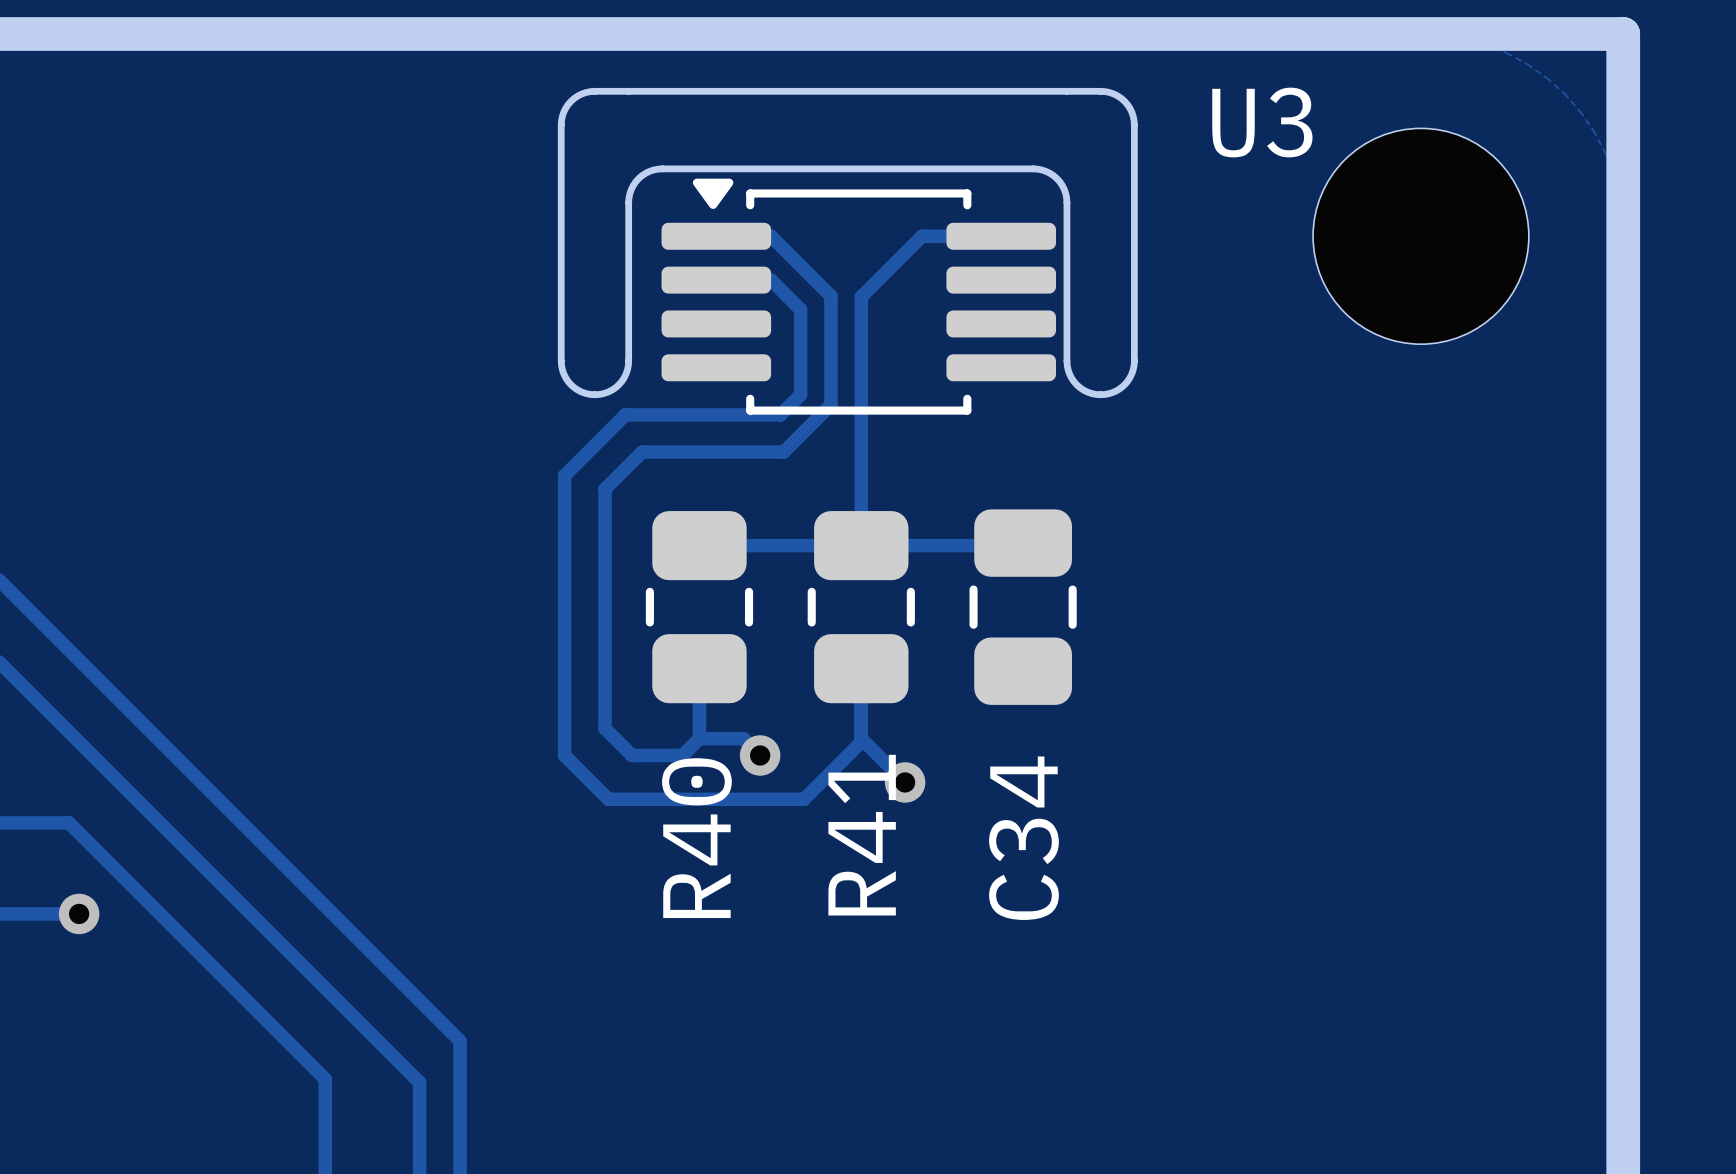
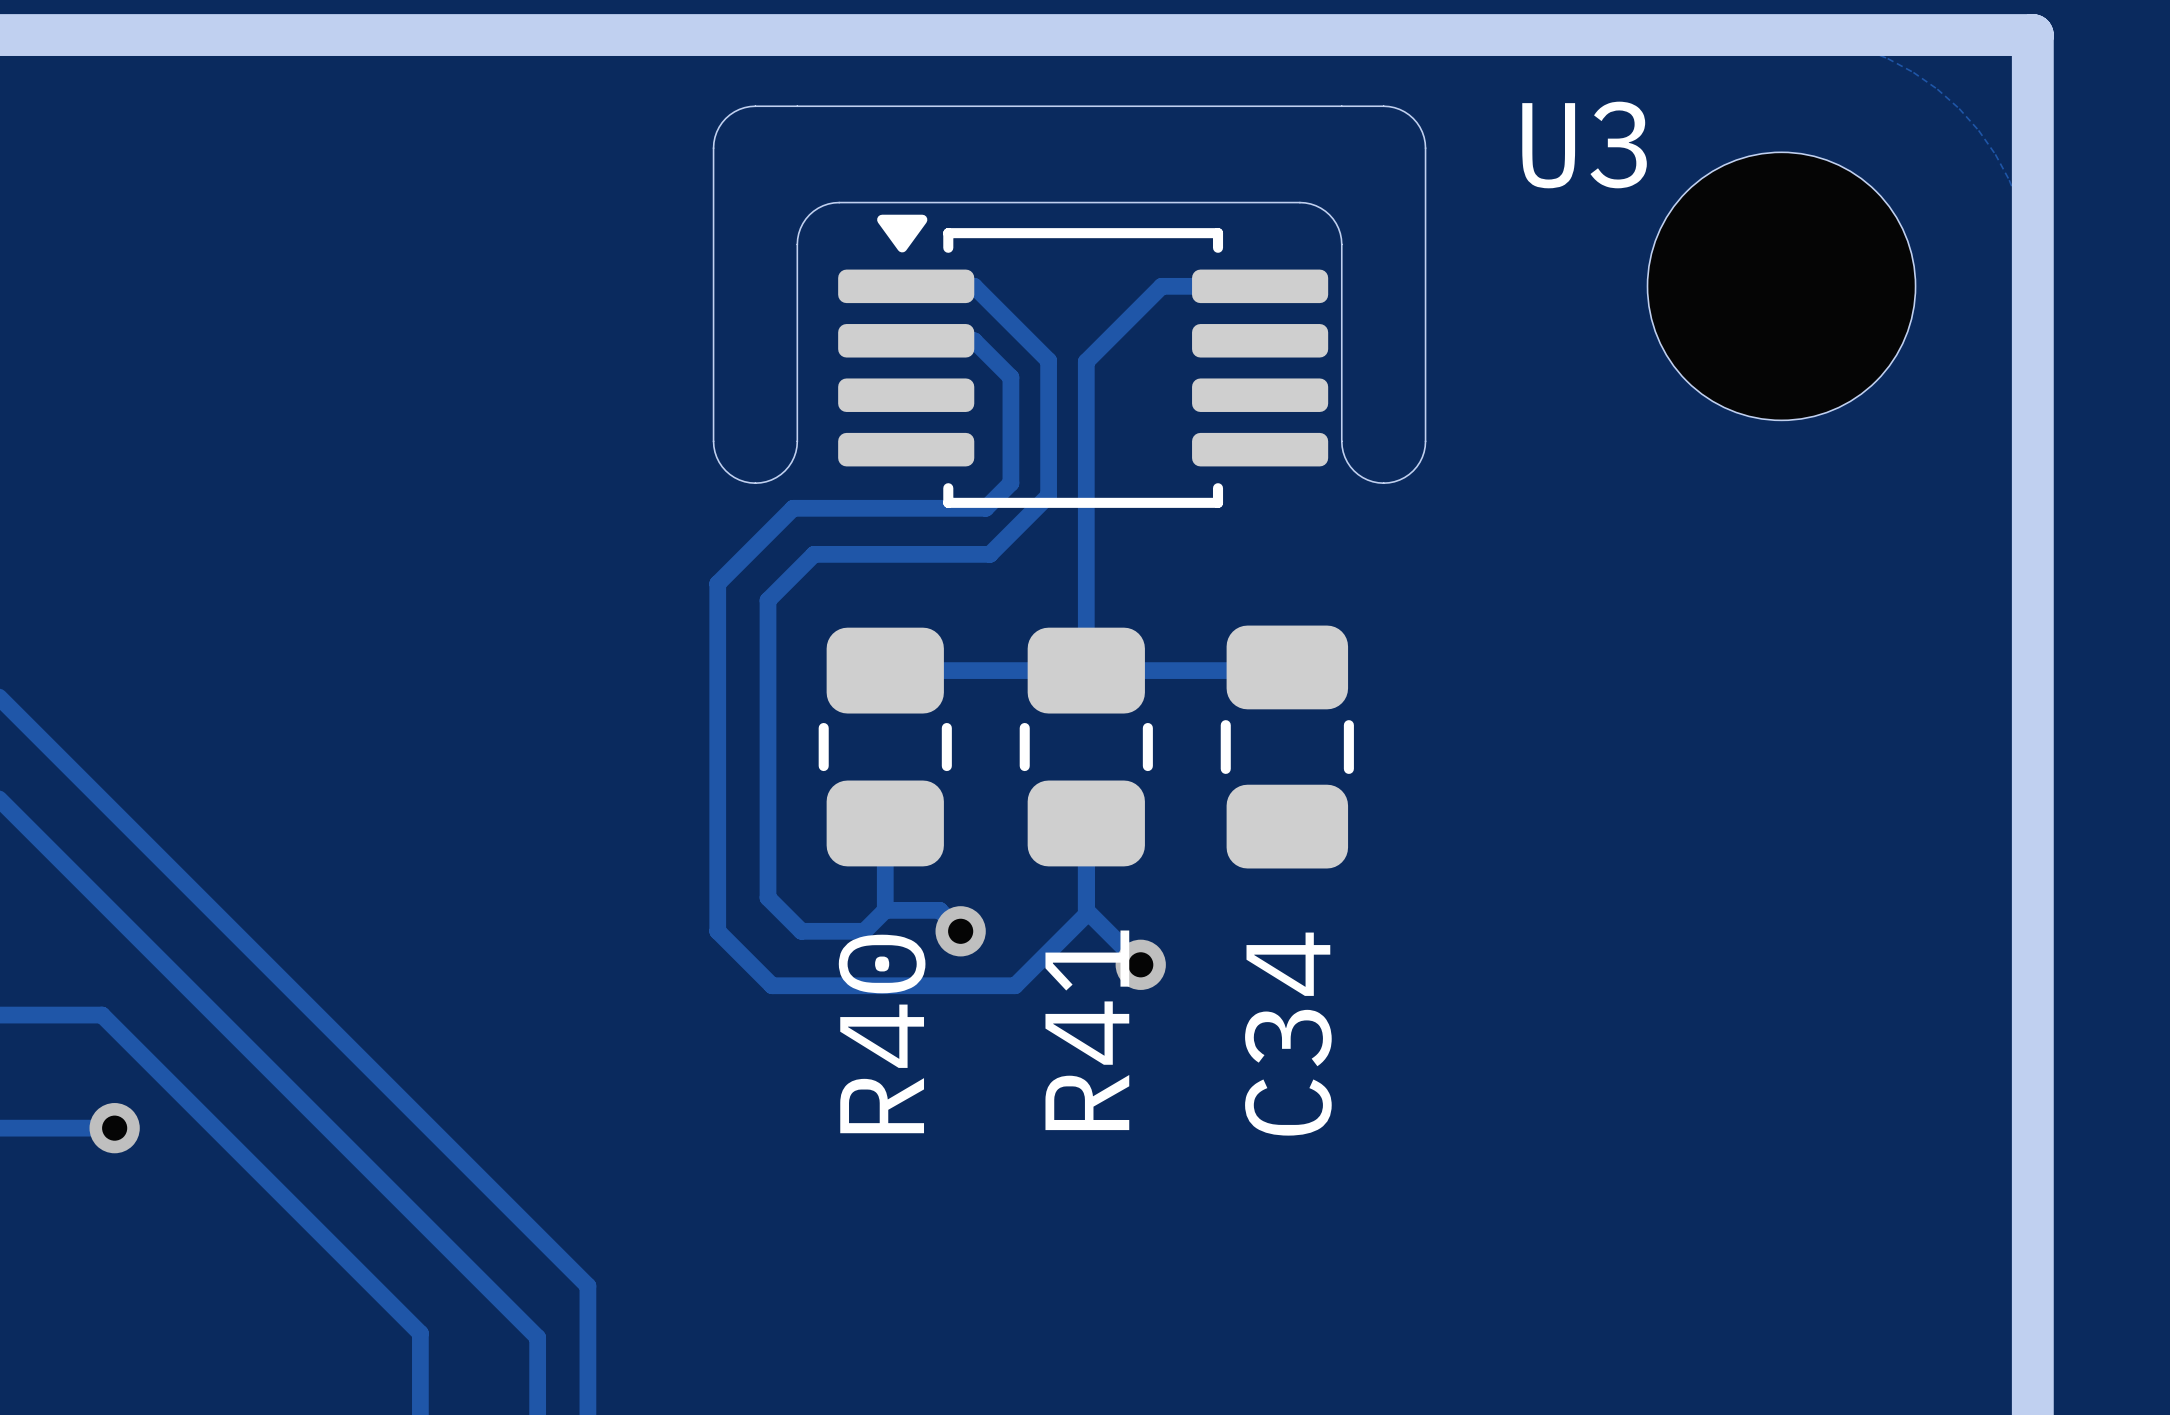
board edge width: thick (594, 91) (1100, 91) (1117, 95) (1129, 108) (1134, 125) (1134, 361) (1129, 377) (1117, 390) (1100, 394) (1083, 390) (1073, 381) (1069, 373) (1066, 361) (1066, 198) (1059, 182) (1046, 171) (1033, 168) (662, 168) (653, 170) (641, 175) (633, 185) (628, 198) (628, 361) (626, 373) (618, 384) (603, 393) (590, 394) (578, 390) (565, 377) (561, 361) (561, 125) (563, 112) (571, 101) (582, 93) (594, 91) -> thin (755, 106) (1383, 106) (1404, 111) (1419, 127) (1425, 148) (1425, 441) (1419, 462) (1404, 477) (1383, 483) (1362, 477) (1350, 466) (1344, 457) (1341, 441) (1341, 238) (1333, 218) (1315, 205) (1299, 202) (839, 202) (828, 203) (813, 211) (802, 223) (797, 238) (797, 441) (794, 457) (785, 470) (766, 481) (749, 482) (734, 477) (719, 462) (713, 441) (713, 148) (716, 132) (725, 118) (739, 109) (755, 106)

